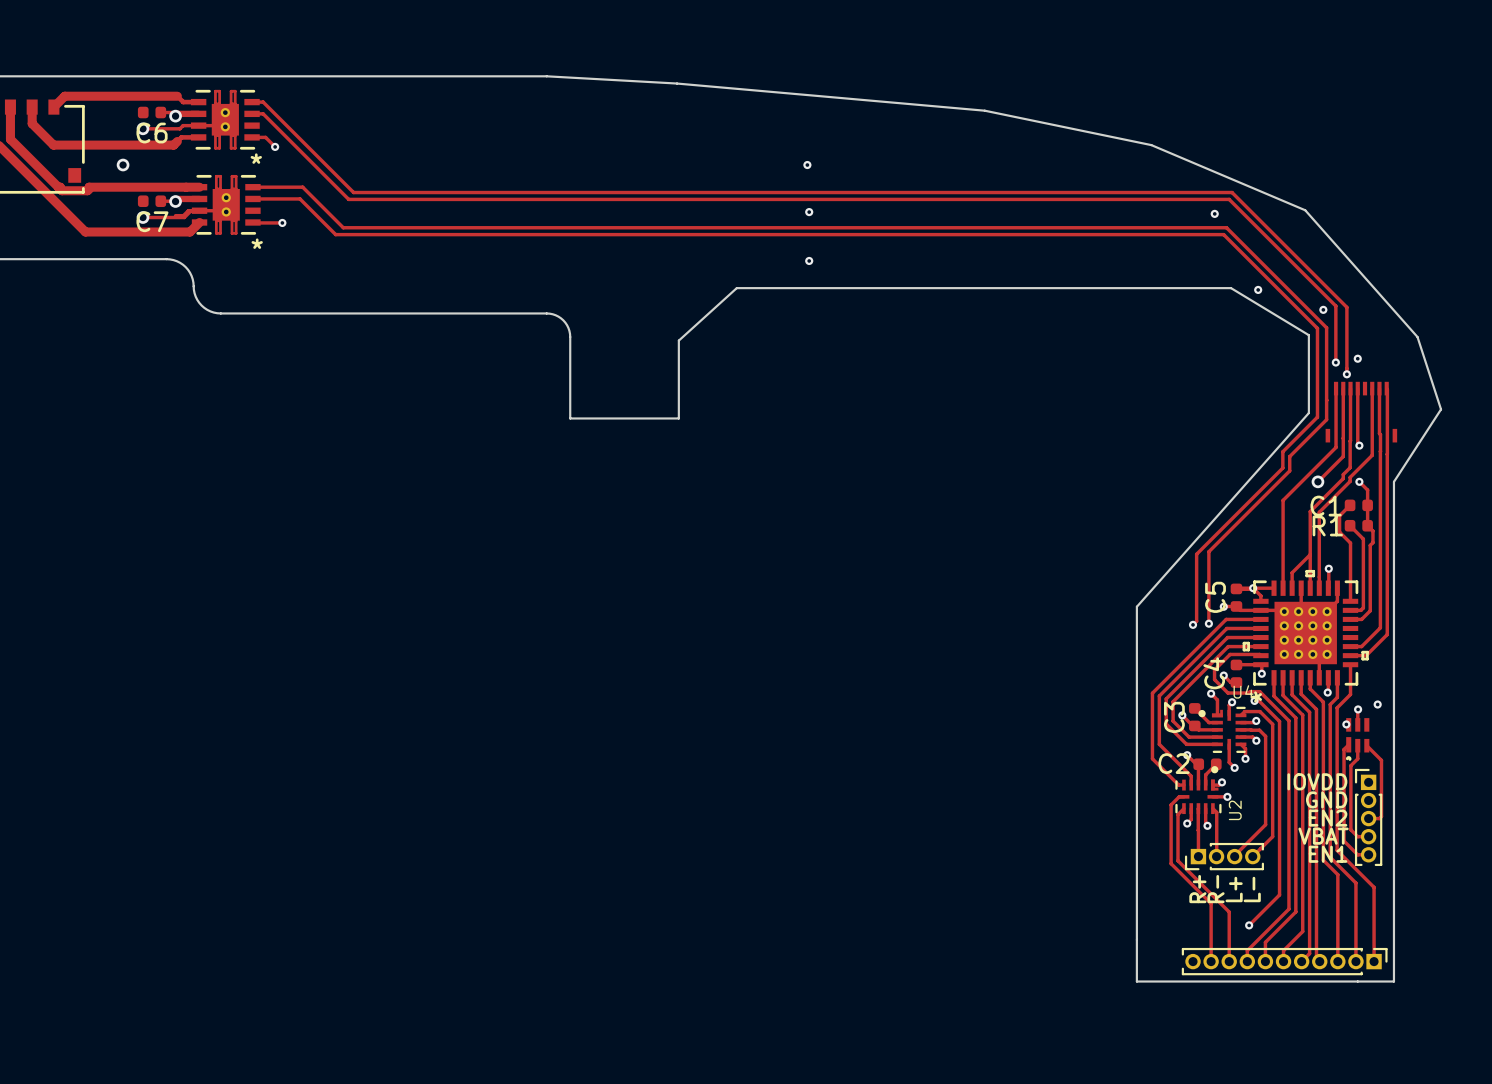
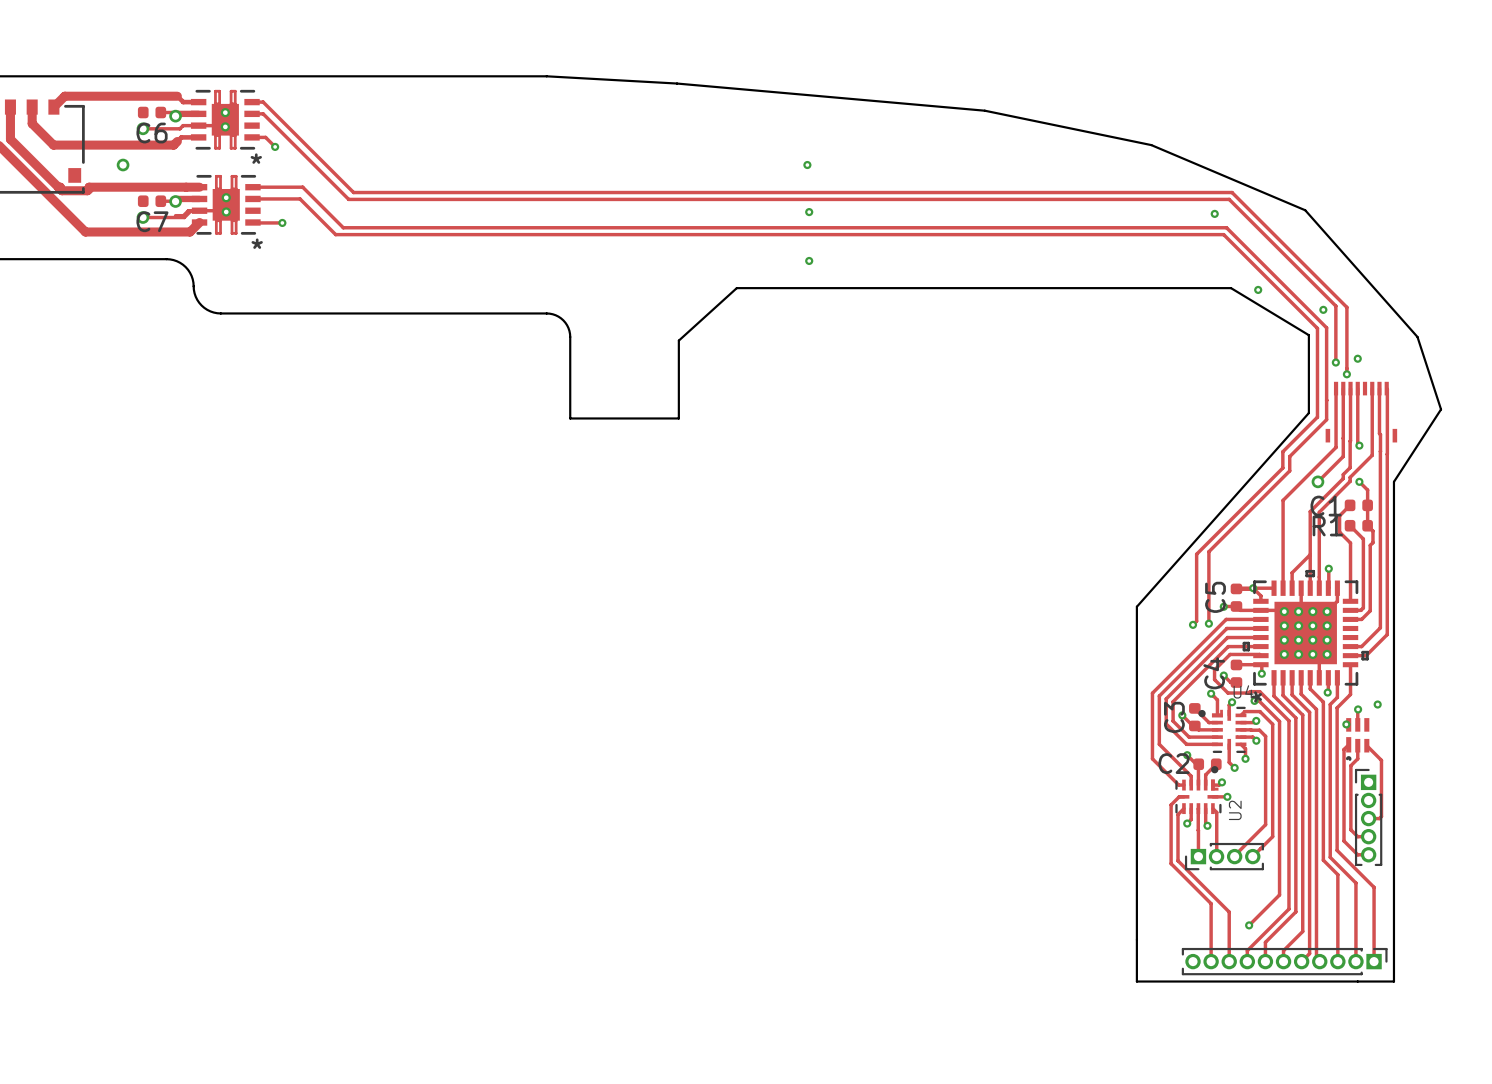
text: IOVDD (1317, 781) -> none
text: GND (1326, 799) -> none
text: EN2 (1328, 818) -> none
text: VBAT (1323, 836) -> none
text: EN1 (1328, 854) -> none
text: R+ (1197, 889) -> none
text: R- (1216, 889) -> none
text: L+ (1234, 889) -> none
text: L- (1252, 889) -> none

